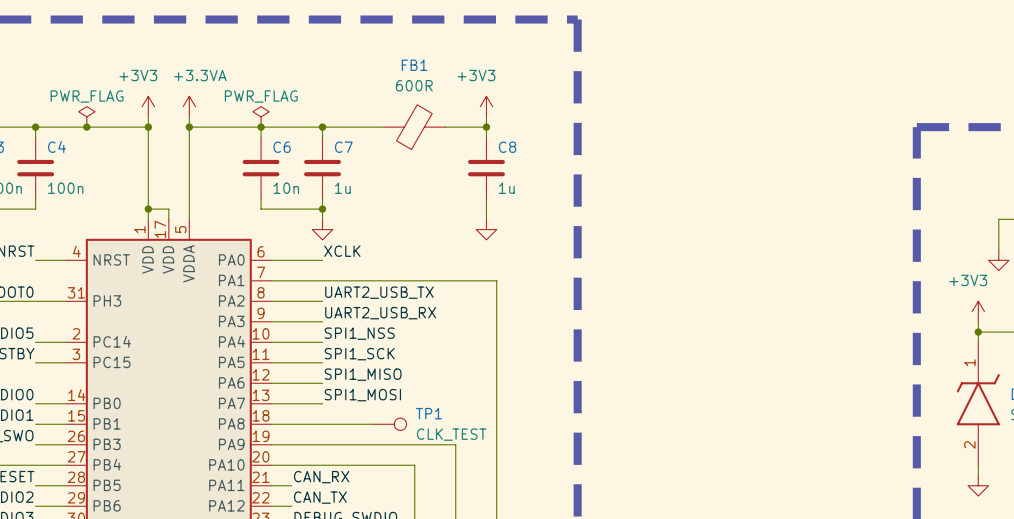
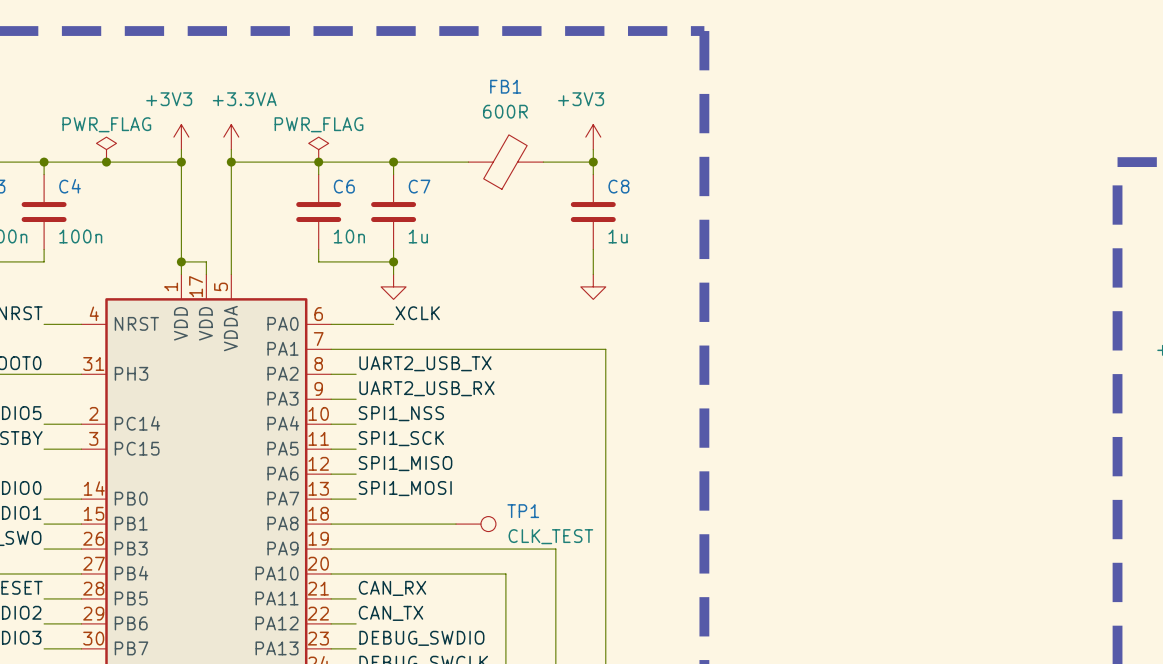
label position: UART2_USB_TX (379, 292) -> UART2_USB_TX (425, 363)
wire: (291, 301) (322, 301) -> none
label position: UART2_USB_RX (380, 313) -> UART2_USB_RX (426, 388)
wire: (291, 321) (322, 321) -> none
label position: SPI1_NSS (359, 333) -> SPI1_NSS (401, 413)
wire: (291, 342) (322, 342) -> none
label position: SPI1_SCK (359, 354) -> SPI1_SCK (401, 438)
wire: (291, 362) (322, 362) -> none
label position: SPI1_MISO (363, 374) -> SPI1_MISO (405, 463)
wire: (291, 383) (322, 383) -> none
label position: SPI1_MOSI (362, 395) -> SPI1_MOSI (405, 488)
wire: (291, 403) (322, 403) -> none

